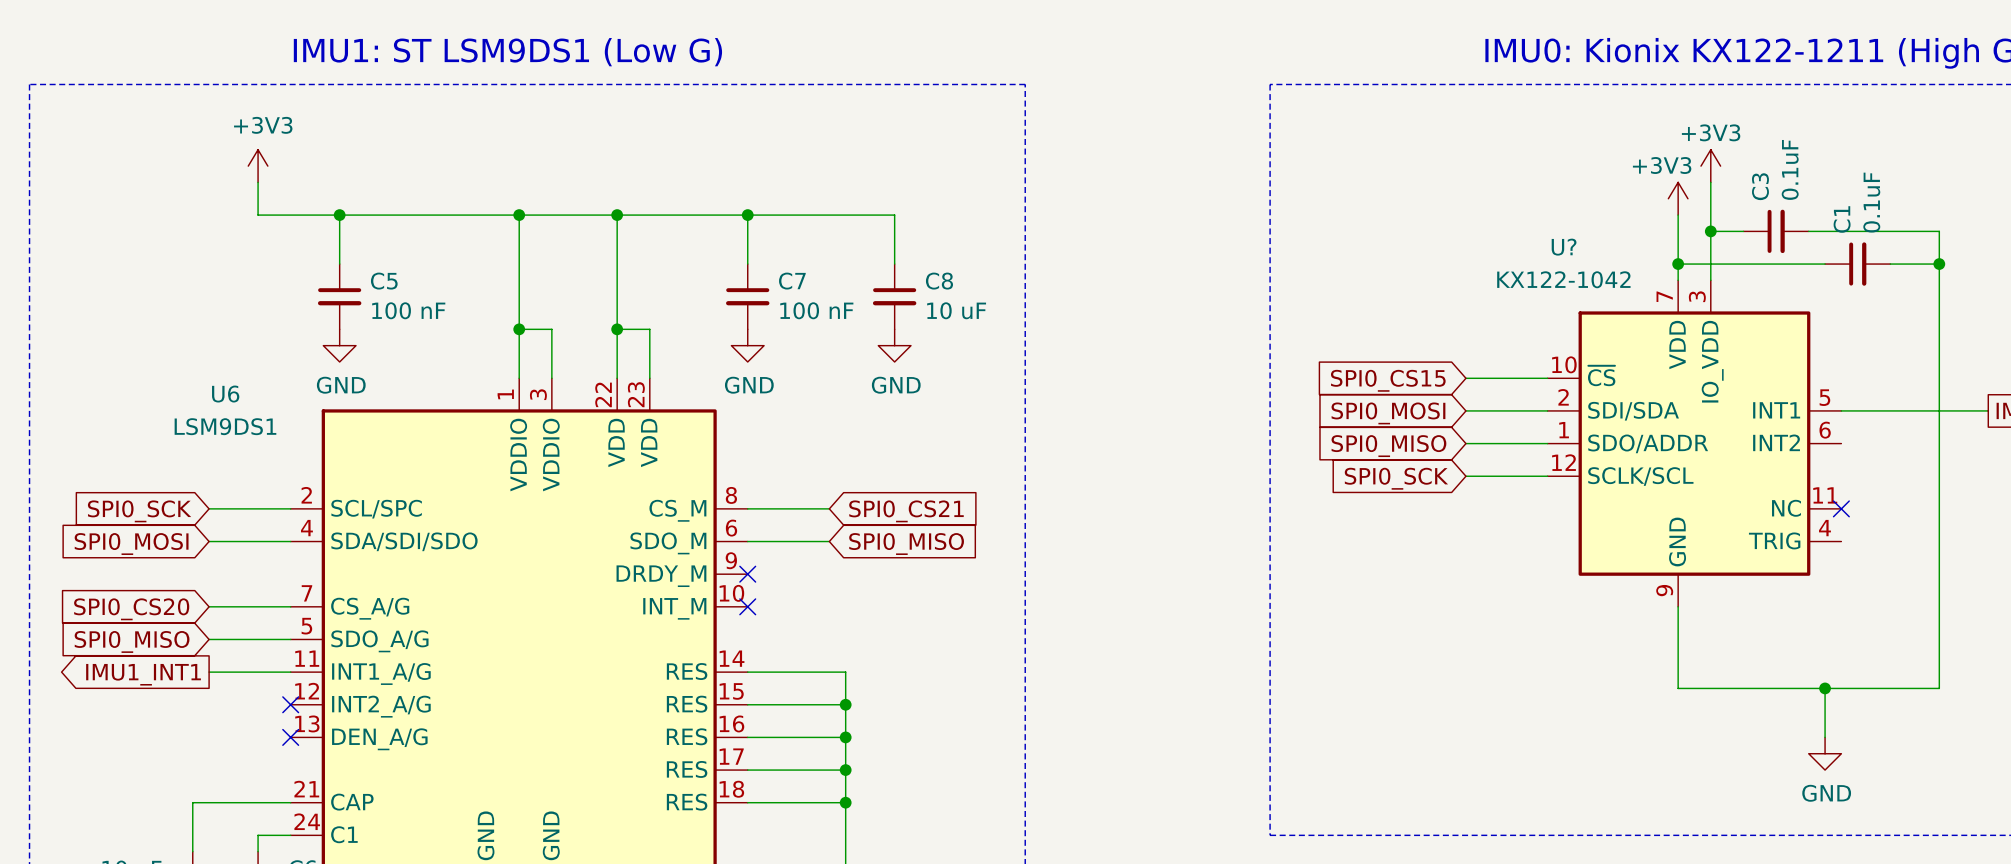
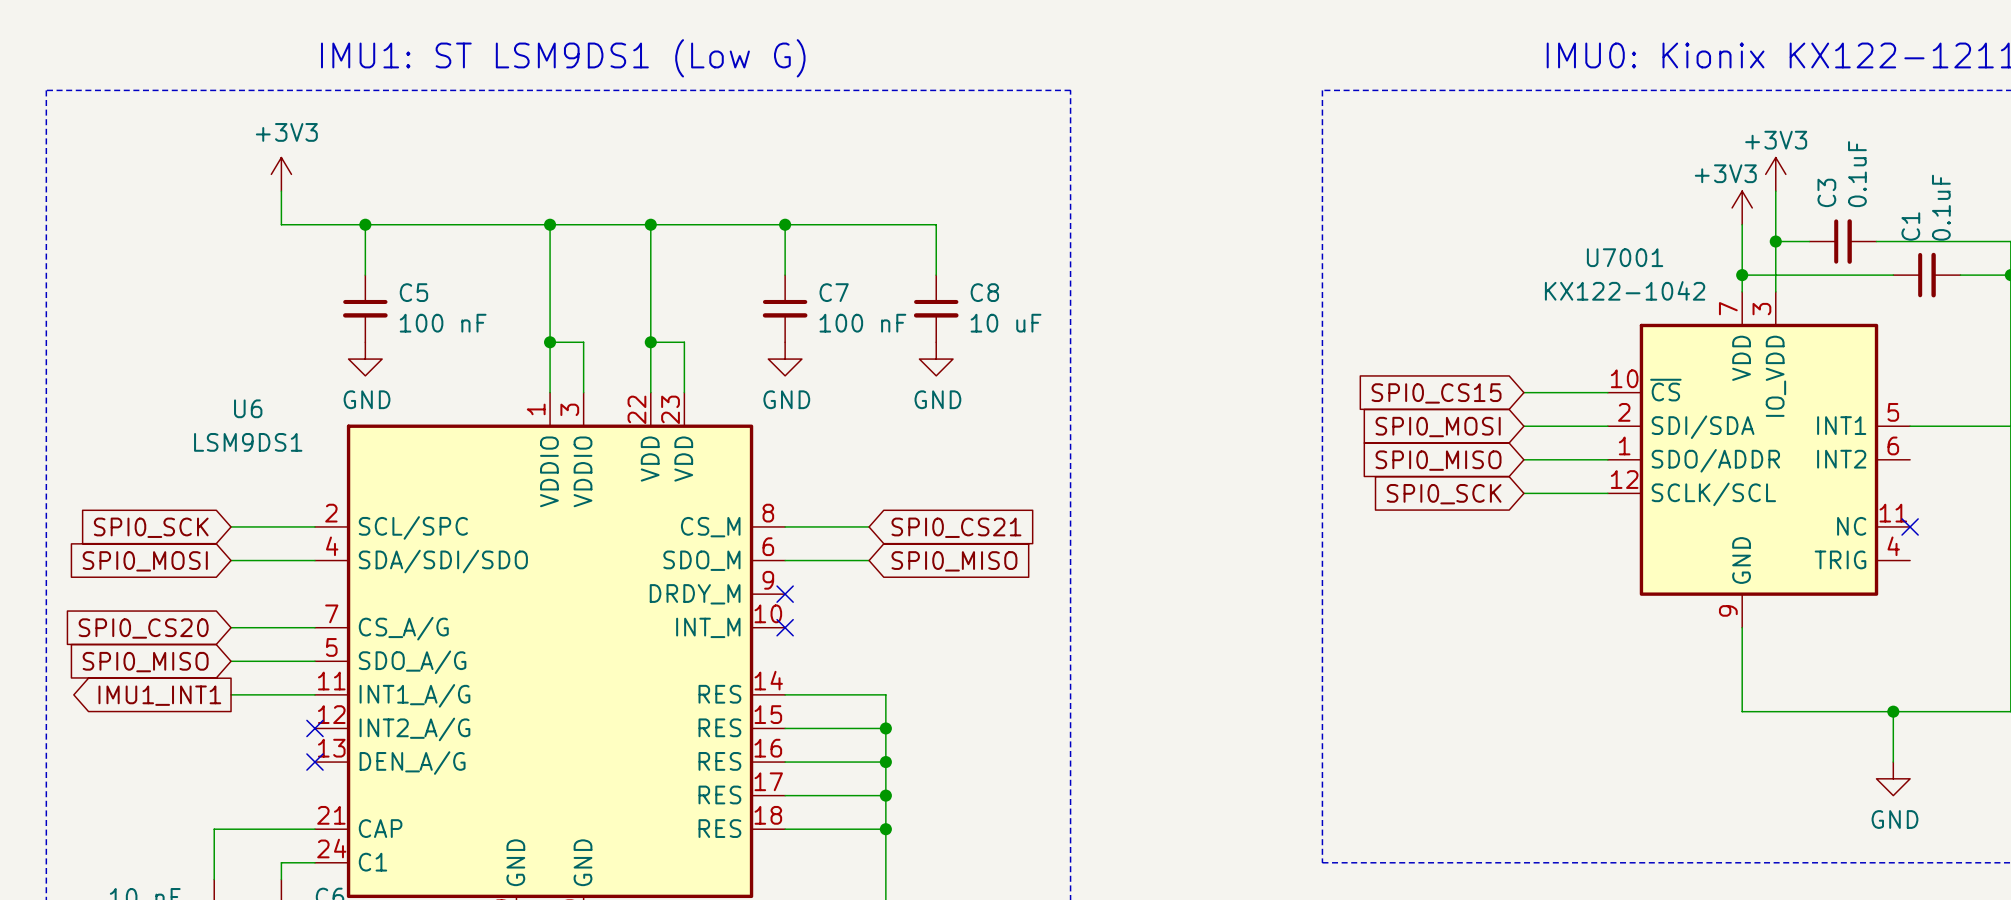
U? name: U? (1564, 247) -> U7001 (1625, 257)

